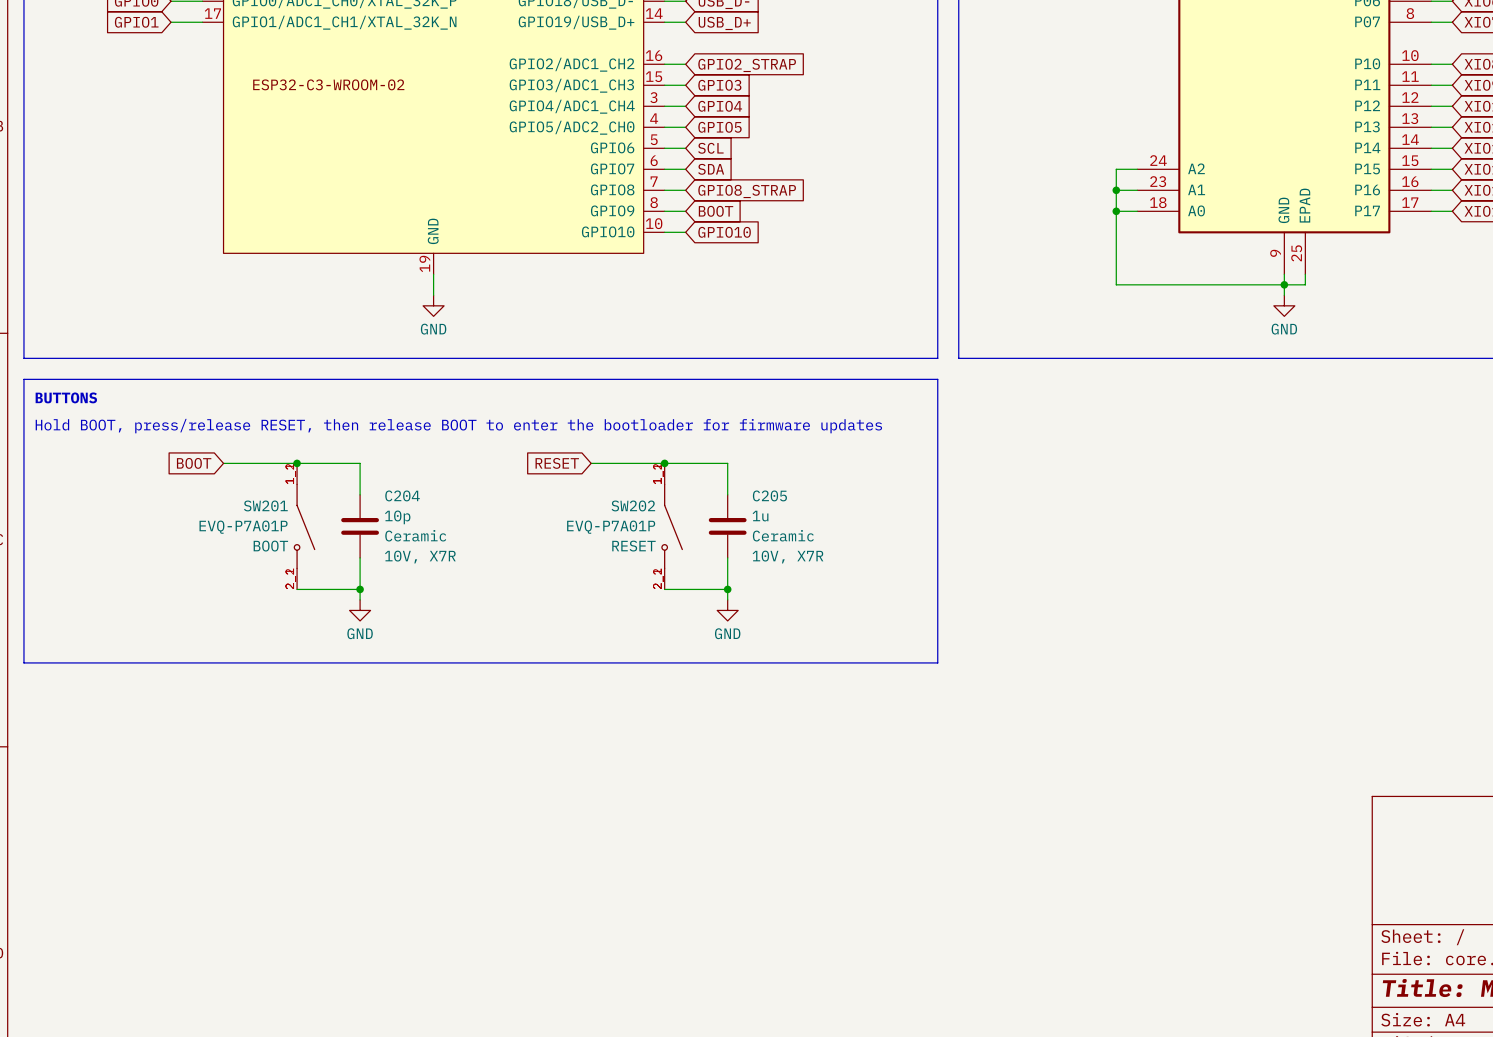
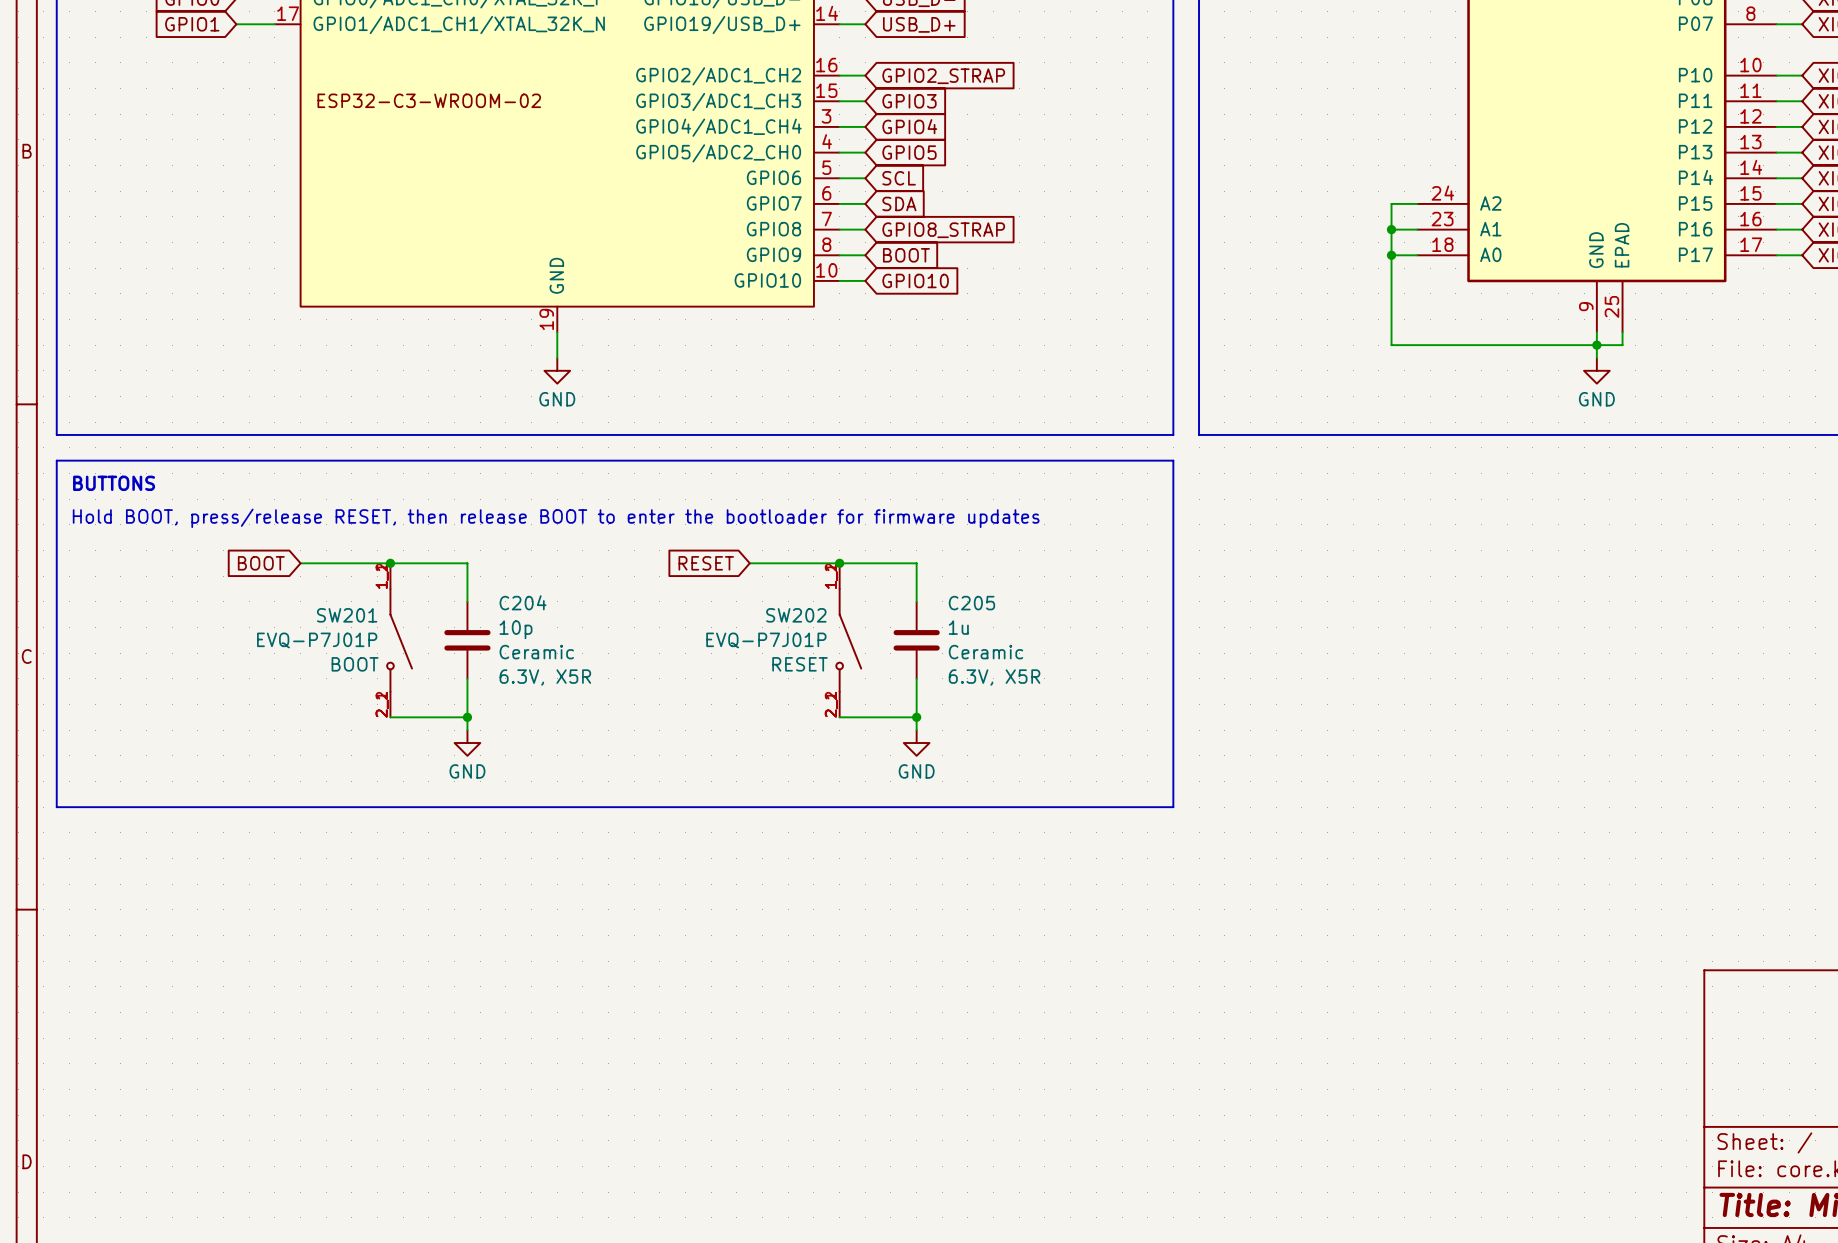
SW201 value: EVQ-P7A01P (243, 527) -> EVQ-P7J01P (317, 640)
SW202 value: EVQ-P7A01P (611, 527) -> EVQ-P7J01P (766, 640)
C204 text: 10V, X7R (420, 557) -> 6.3V, X5R (545, 677)
C205 text: 10V, X7R (787, 557) -> 6.3V, X5R (994, 677)

